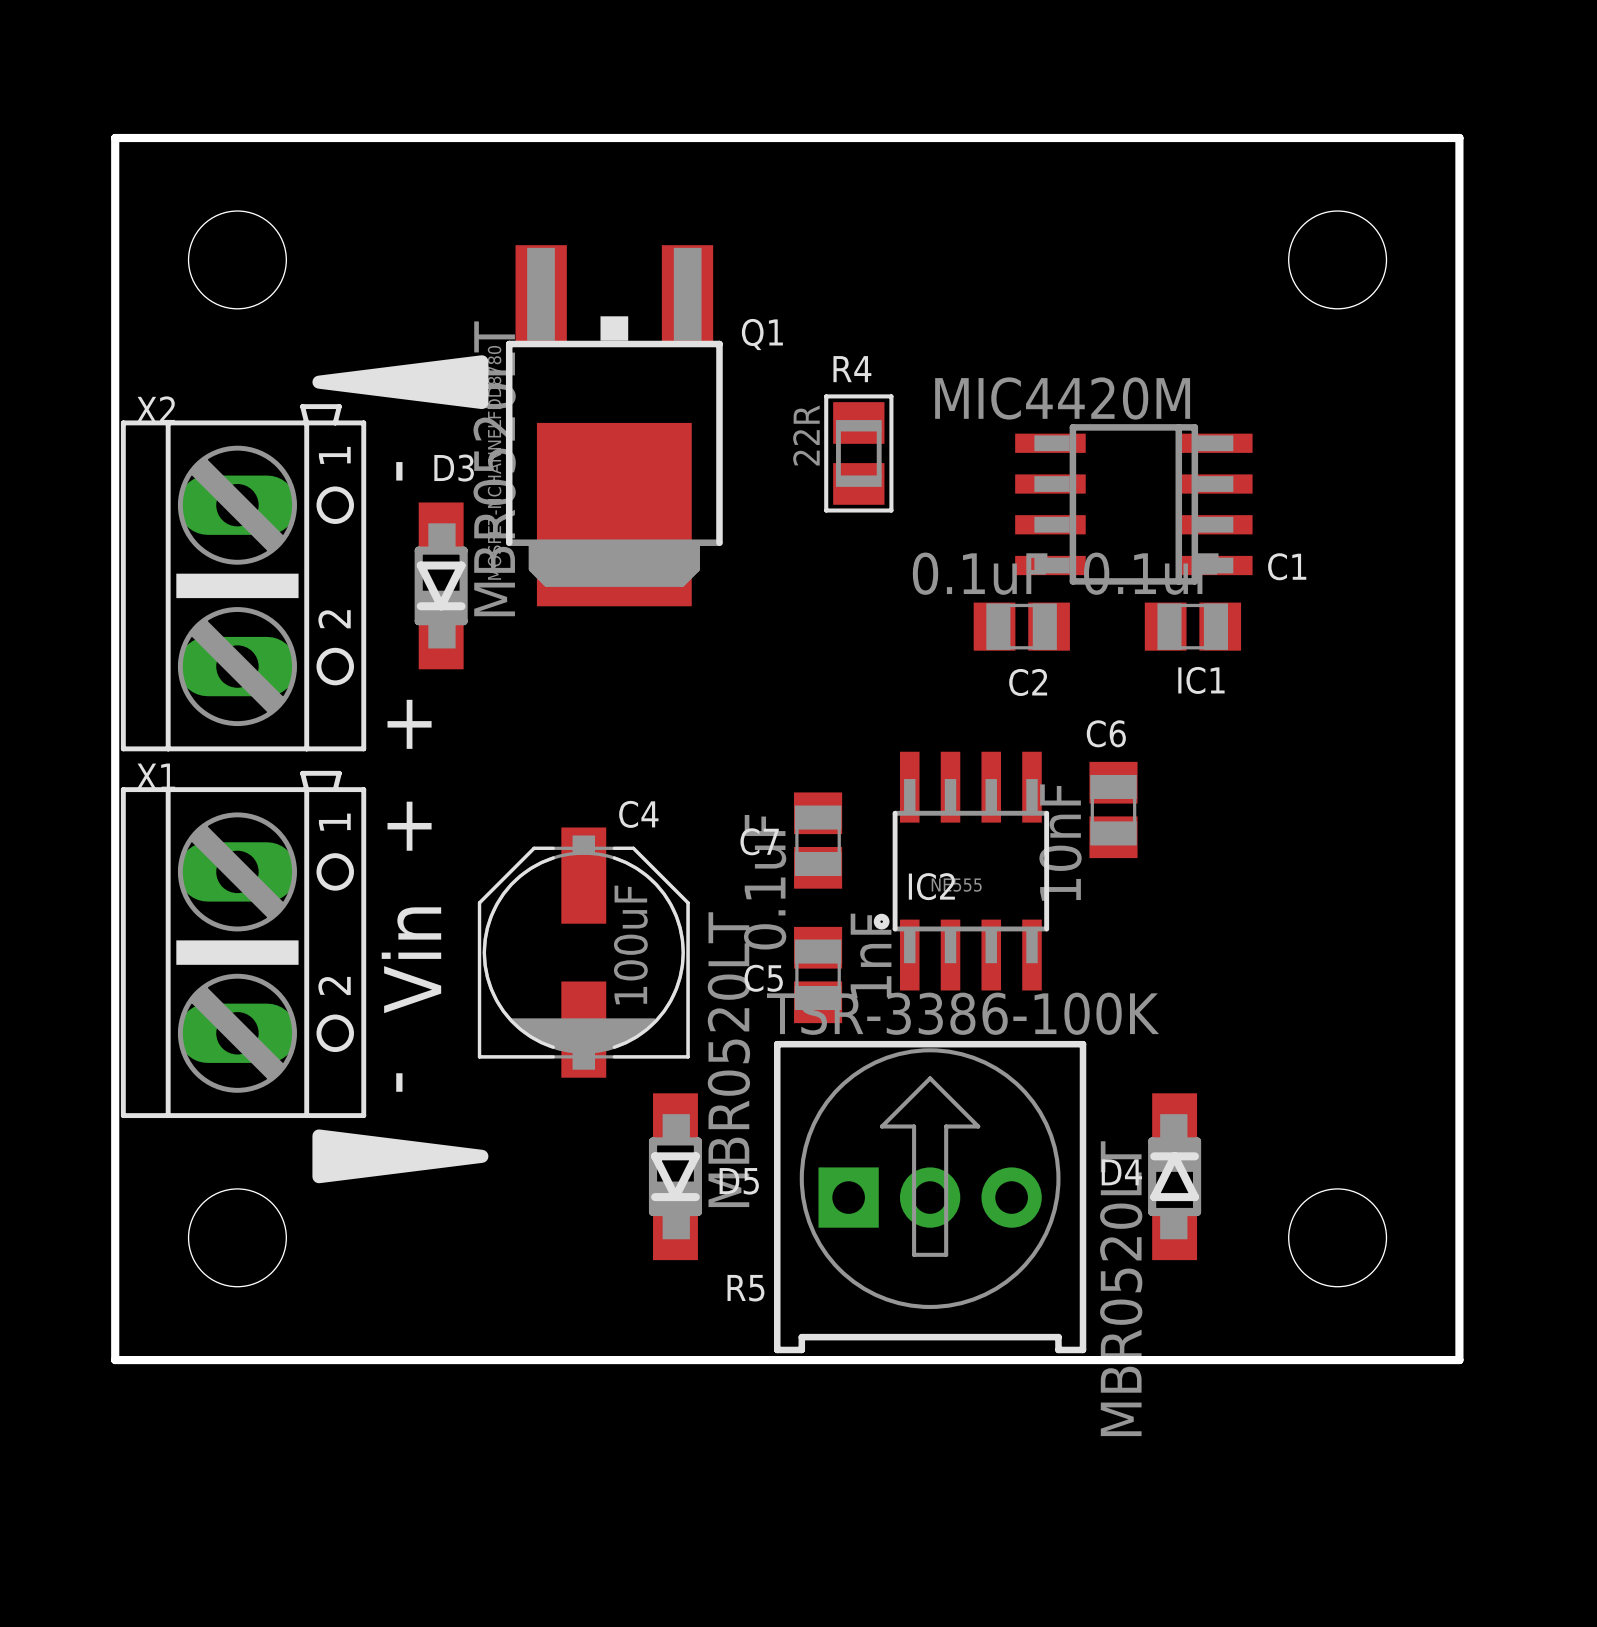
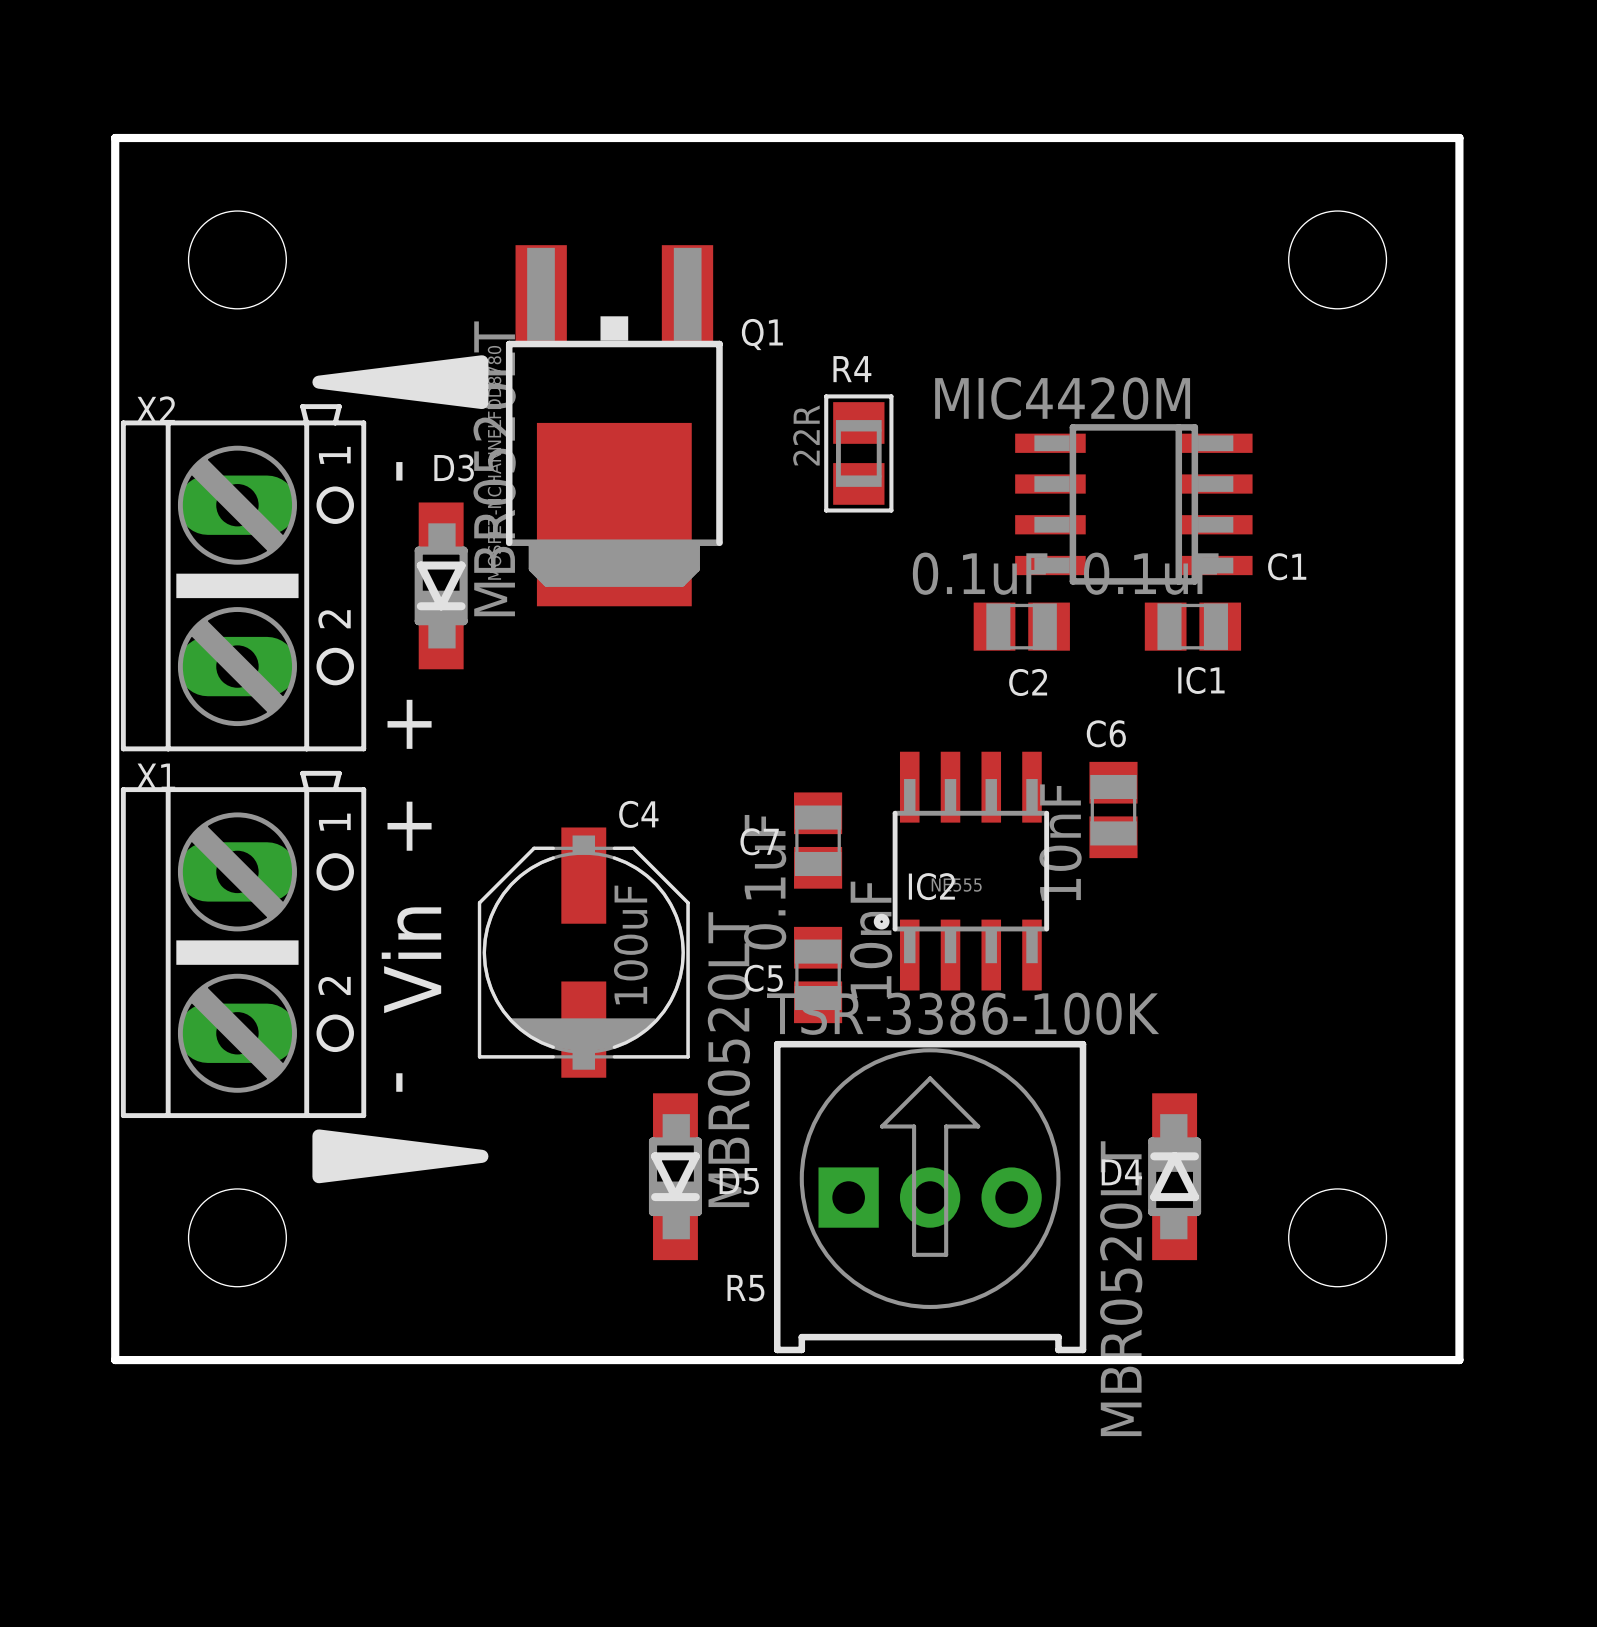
C5 value: 1nF (871, 955) -> 10nF (871, 939)

